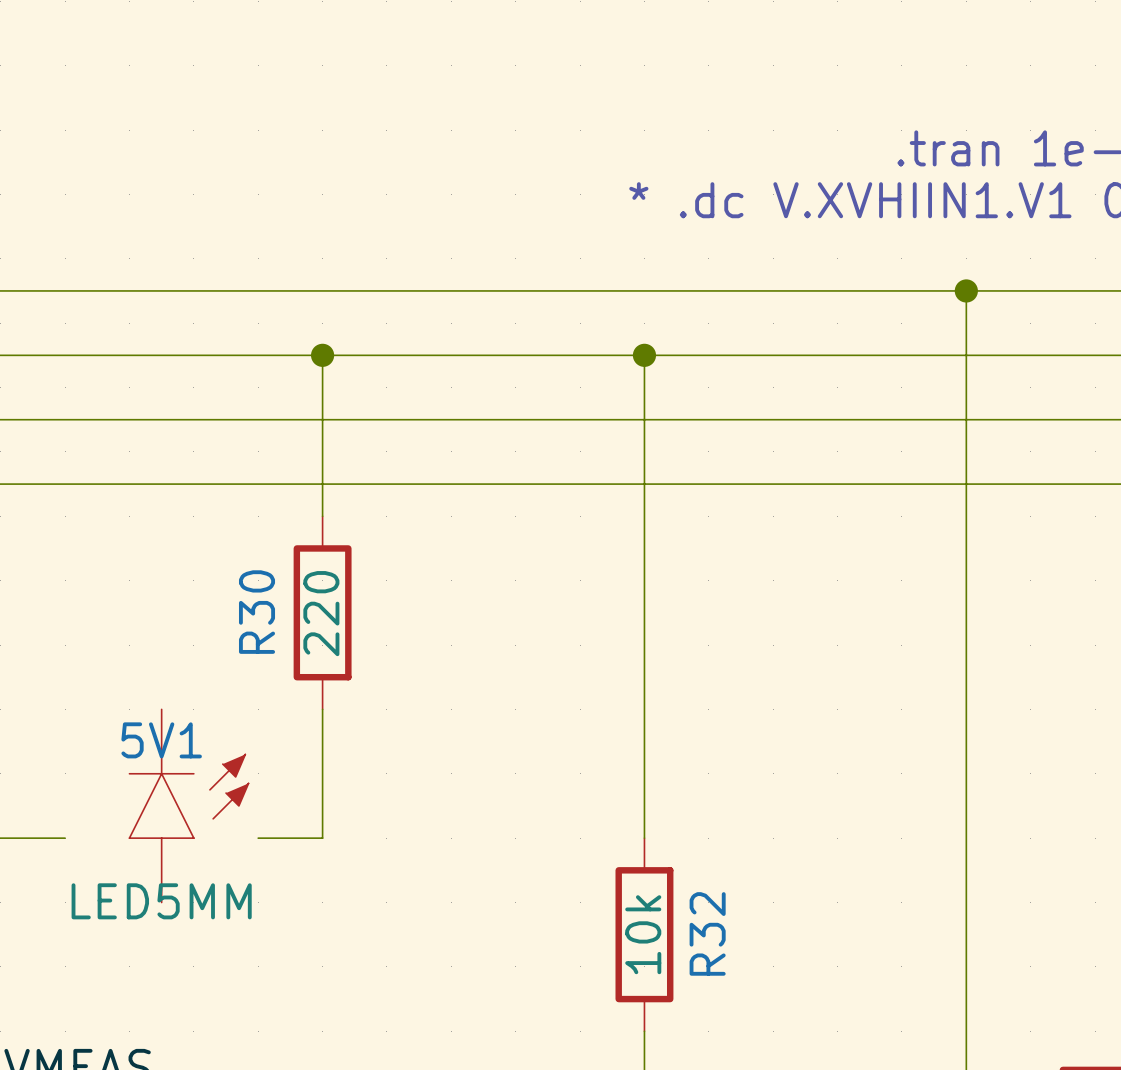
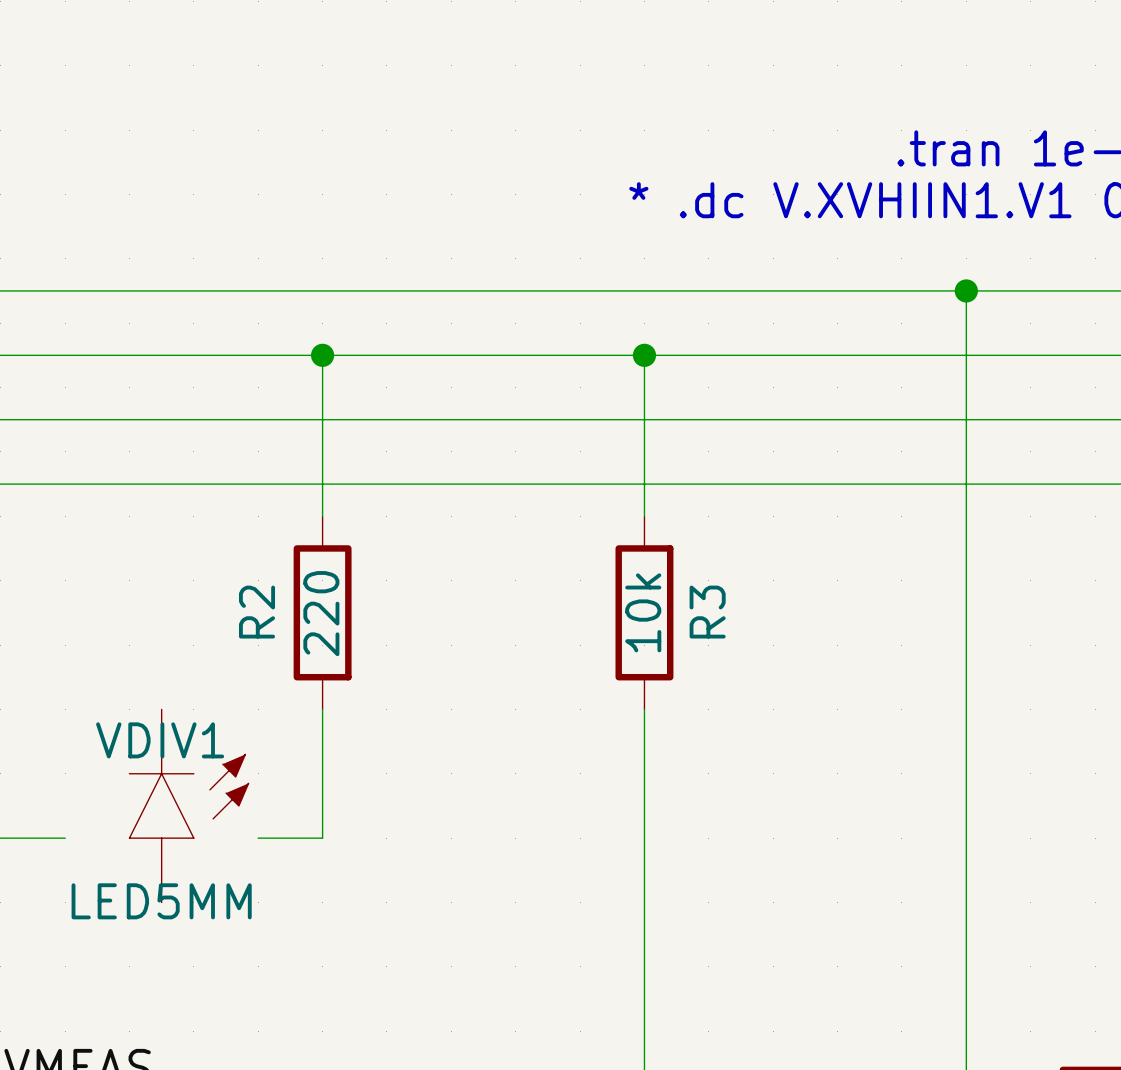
wire: (644, 516) (644, 709) -> (644, 838) (644, 1031)
R30 name: R30 (257, 612) -> R2 (257, 612)
R3: none -> 10k (644, 612)
5V1 name: 5V1 (161, 740) -> VDIV1 (160, 740)
R32: 10k (644, 934) -> none

